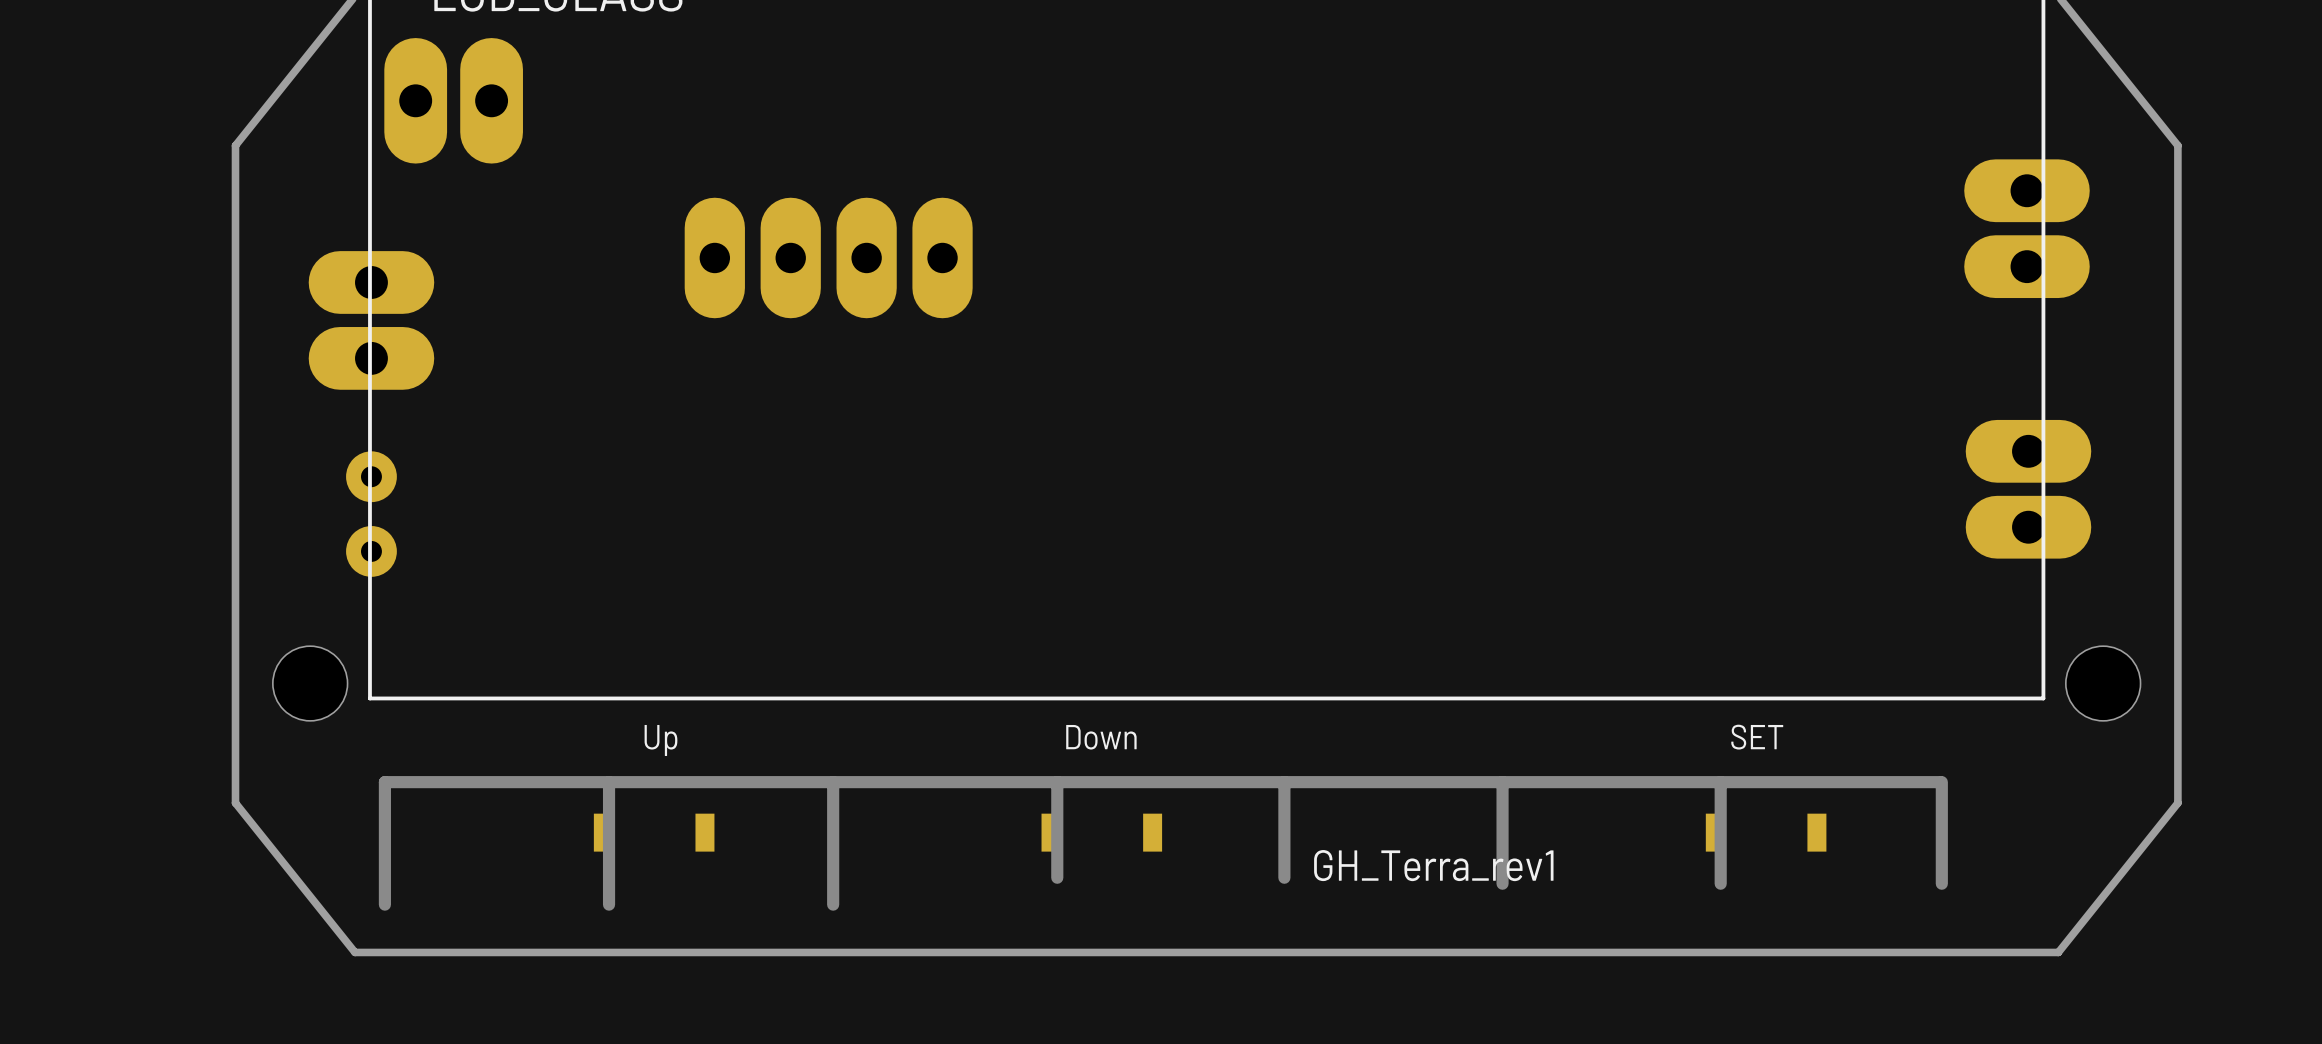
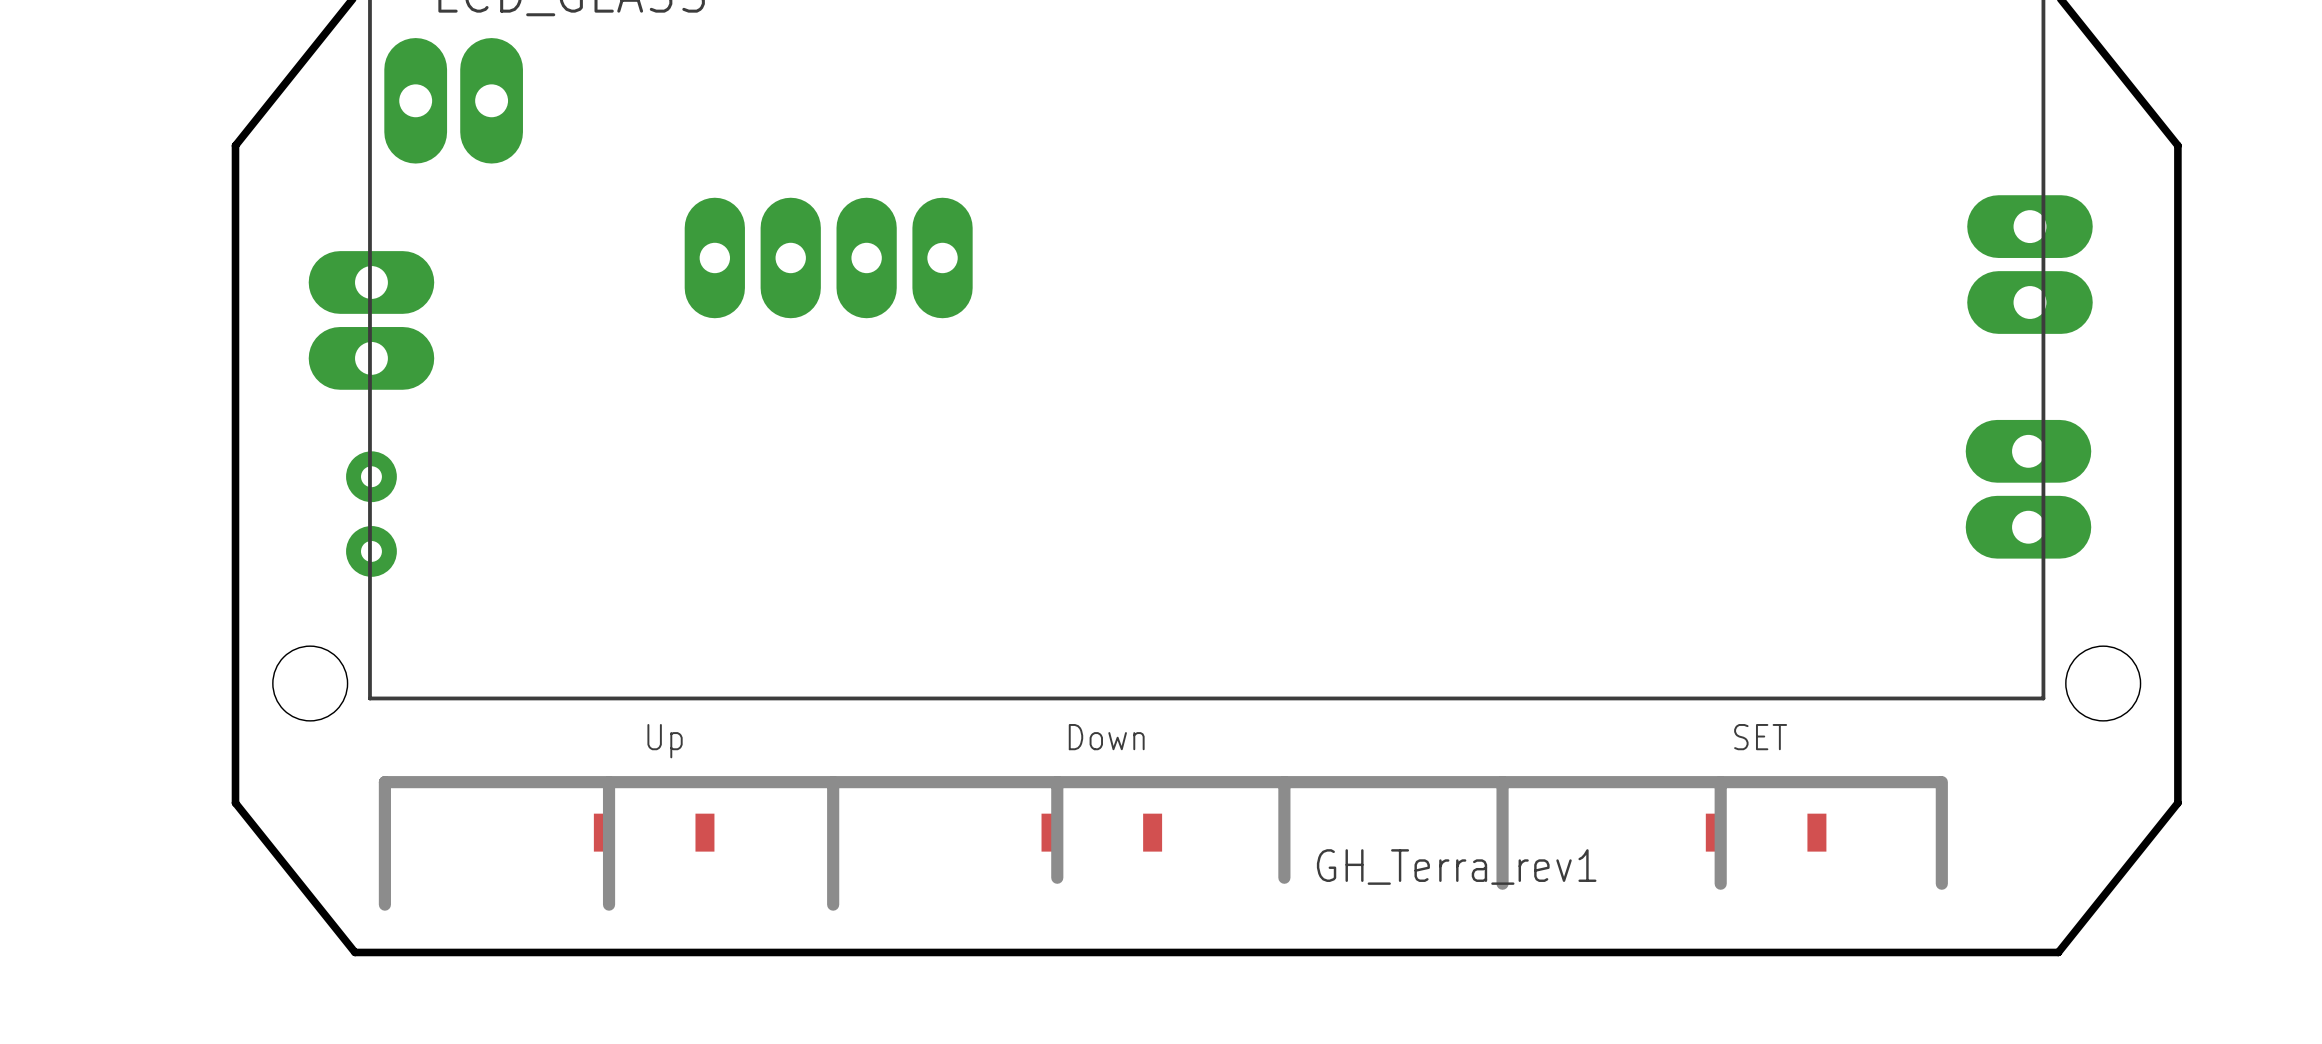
part position: (2026, 228) -> (2029, 264)

